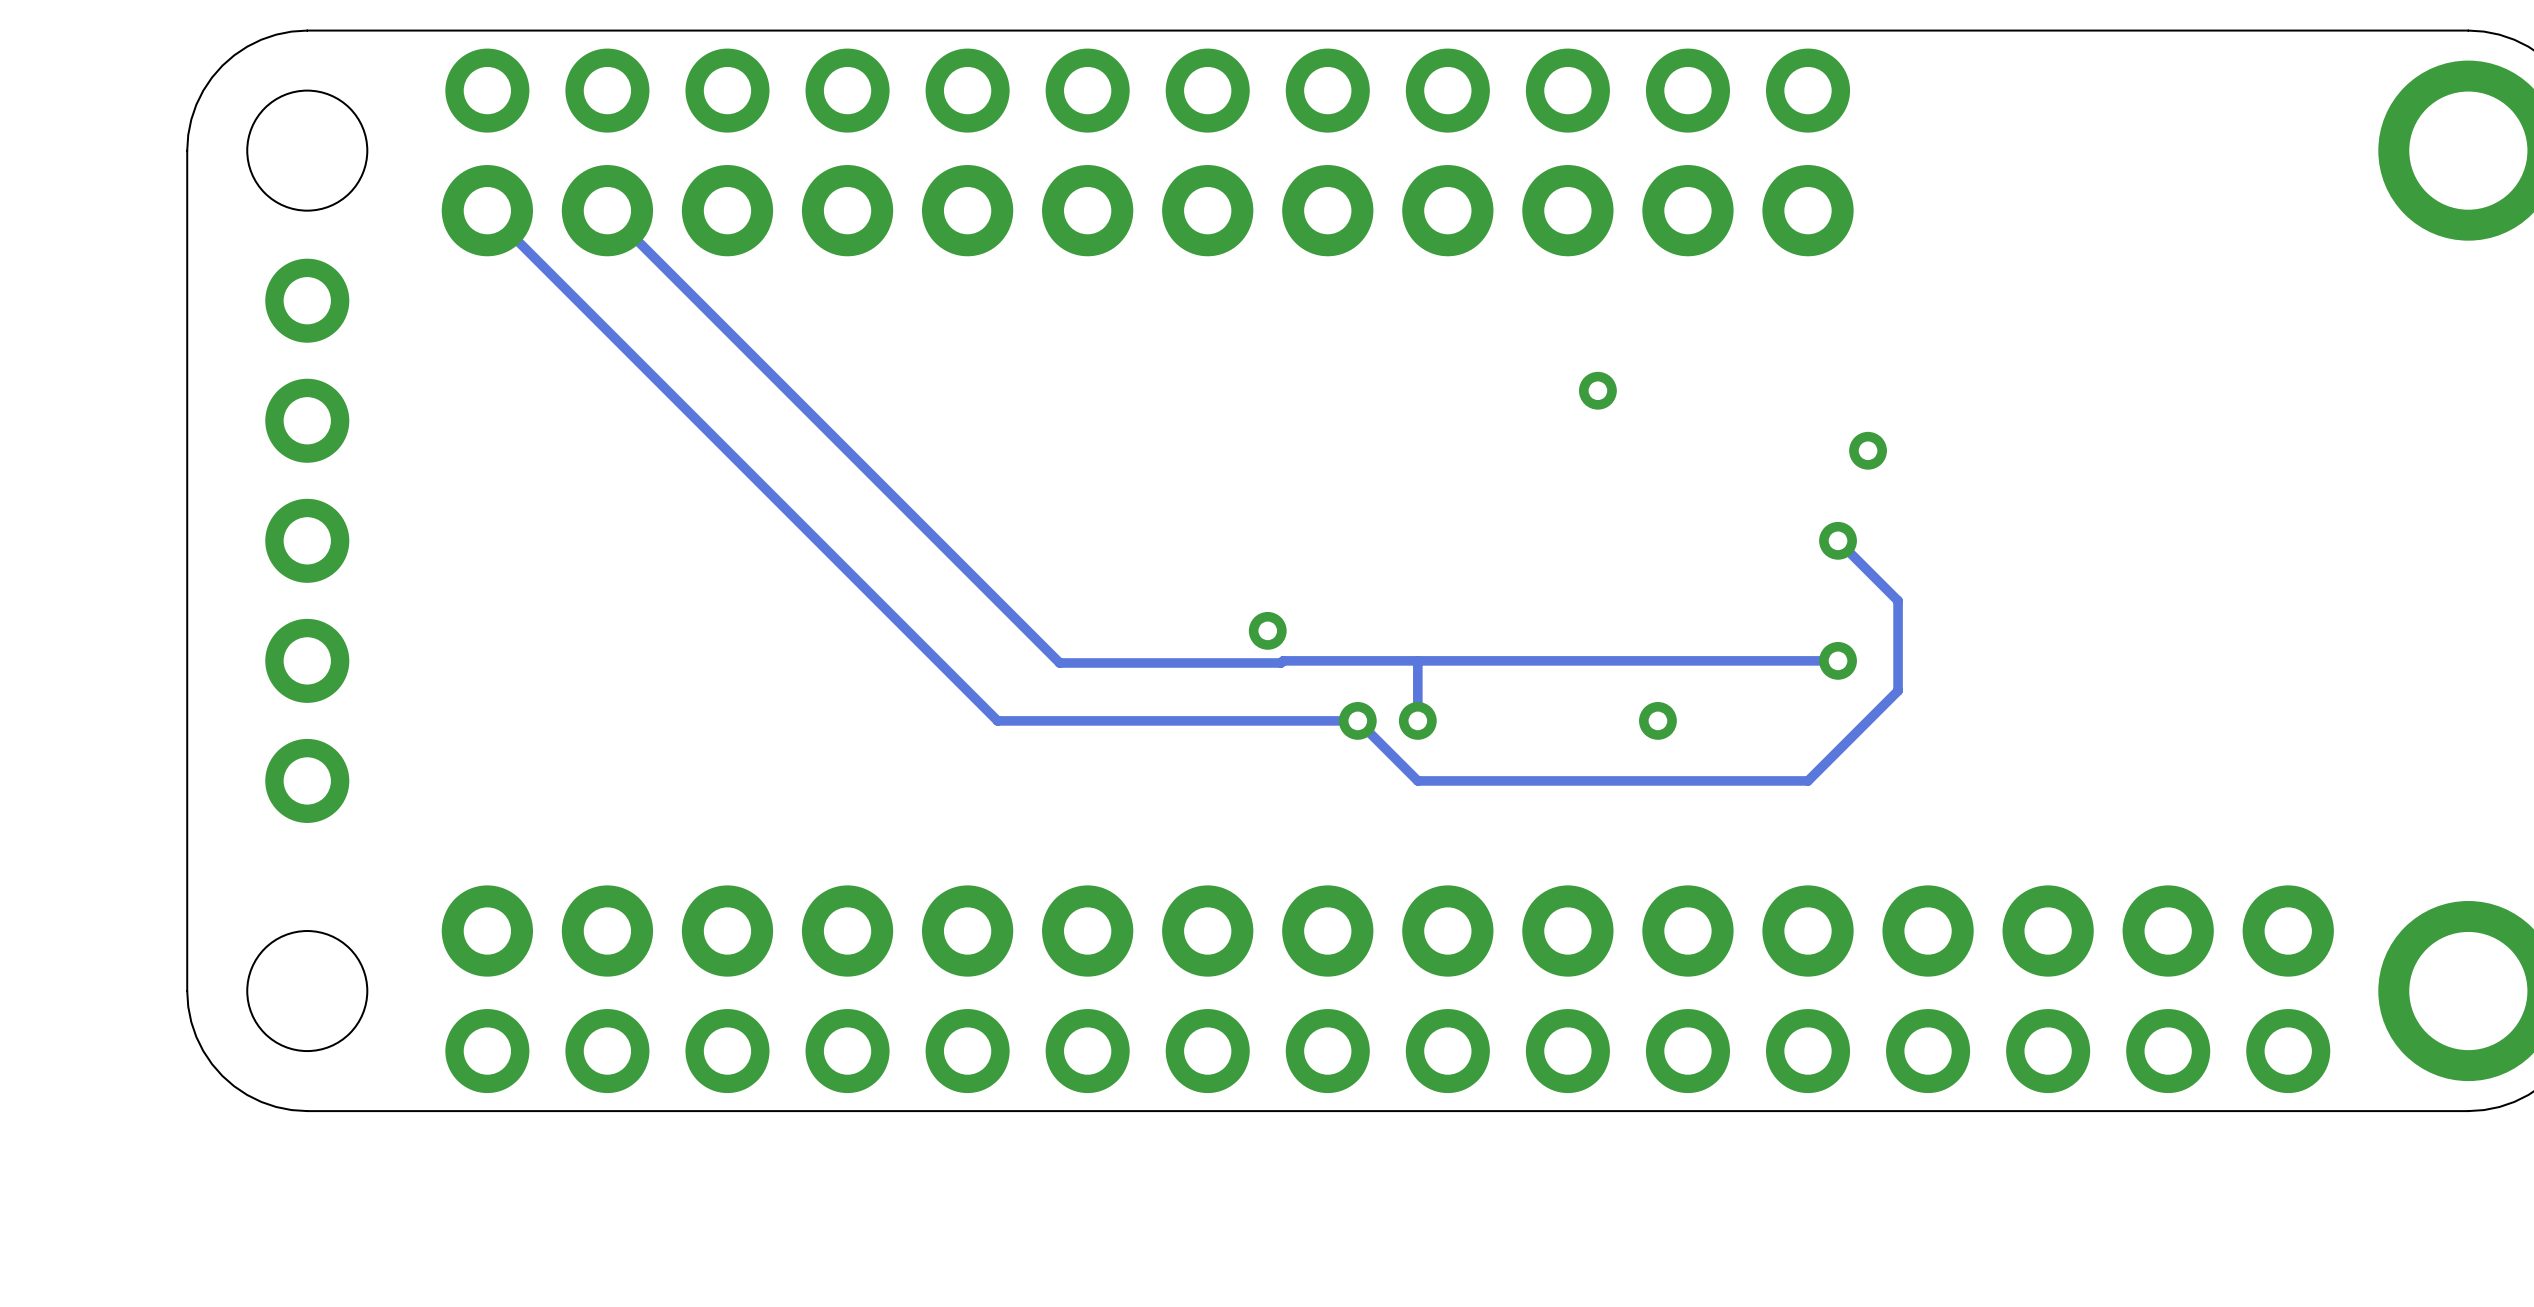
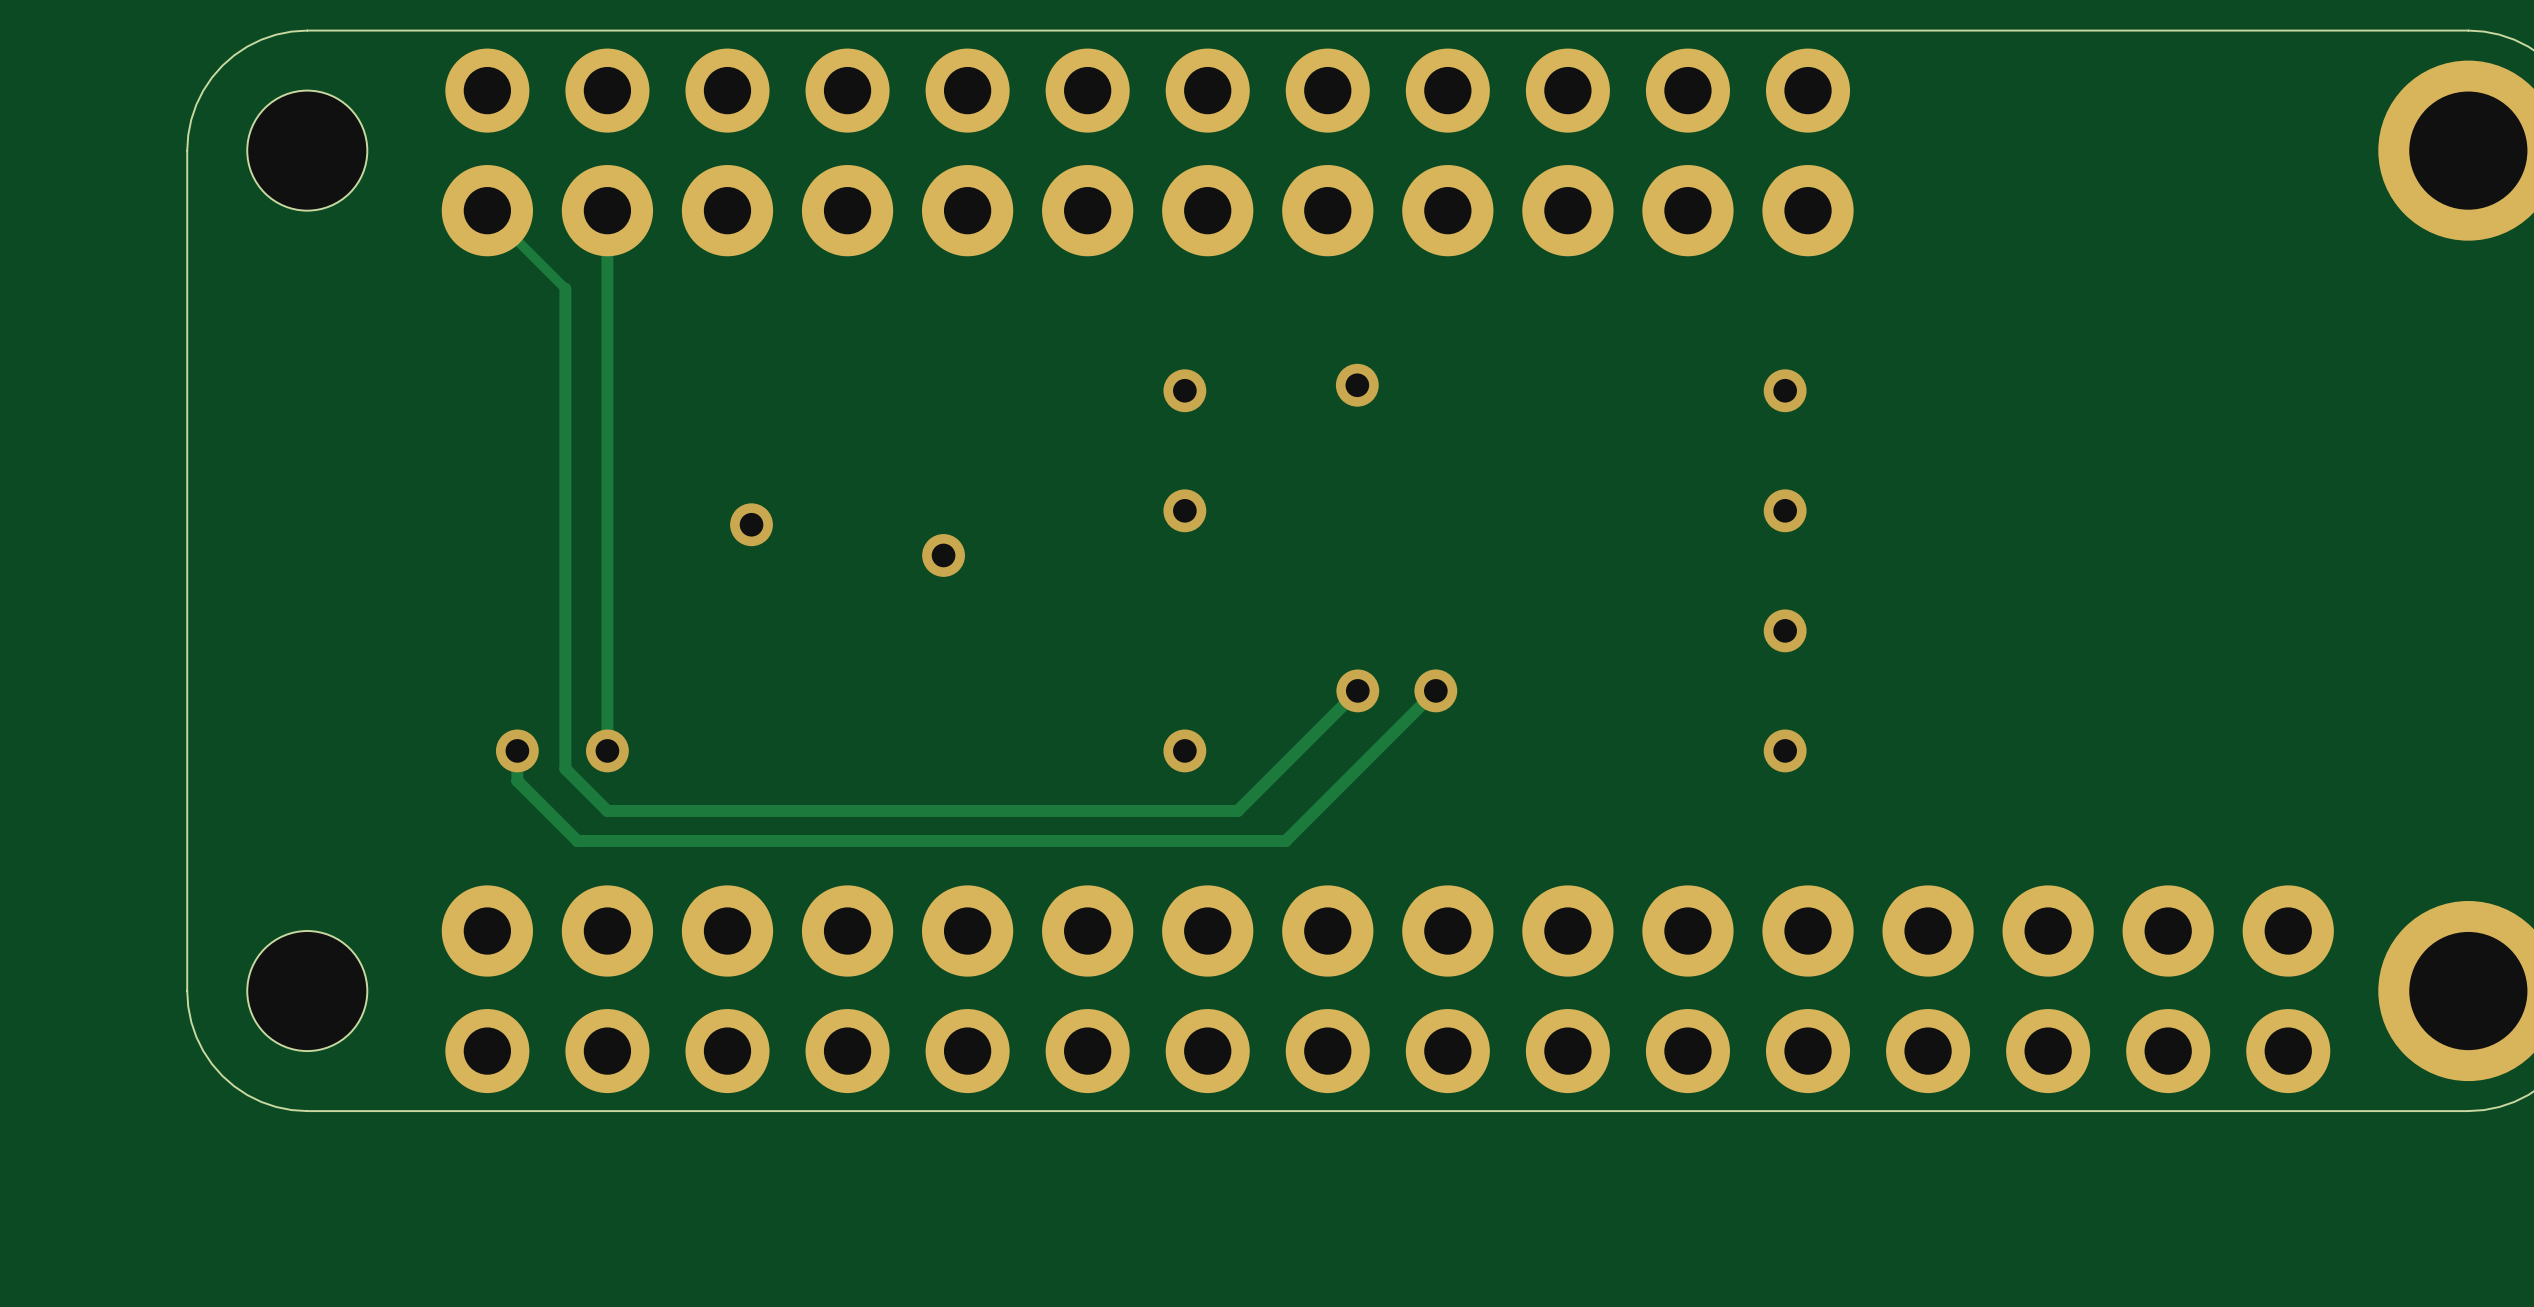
track: (607, 210) (1059, 662) (1838, 660) -> (607, 210) (607, 750)
track: (565, 288) (997, 720) (1357, 720) (1417, 780) (1808, 780) (1898, 690) (1898, 600) (1838, 540) -> (565, 288) (565, 768) (607, 810) (1237, 810) (1357, 690)
via: none -> (1357, 385)
via: none -> (1184, 390)
via: (1597, 390) -> none
via: none -> (1785, 390)
via: (1868, 450) -> none
via: none -> (1184, 510)
via: none -> (1785, 510)
via: none -> (751, 524)
part: (307, 540) -> none
via: (1838, 540) -> none
via: none -> (943, 555)
via: (1267, 630) -> none
via: none -> (1785, 630)
track: (1417, 660) (1417, 720) -> none
via: (1838, 660) -> none
track: none -> (1435, 690) (1285, 840) (577, 840) (517, 780) (517, 750)
via position: (1357, 720) -> (1357, 690)
via position: (1417, 720) -> (1435, 690)
via: (1657, 720) -> none
via: none -> (517, 750)
via: none -> (607, 750)
via: none -> (1184, 750)
via: none -> (1785, 750)

